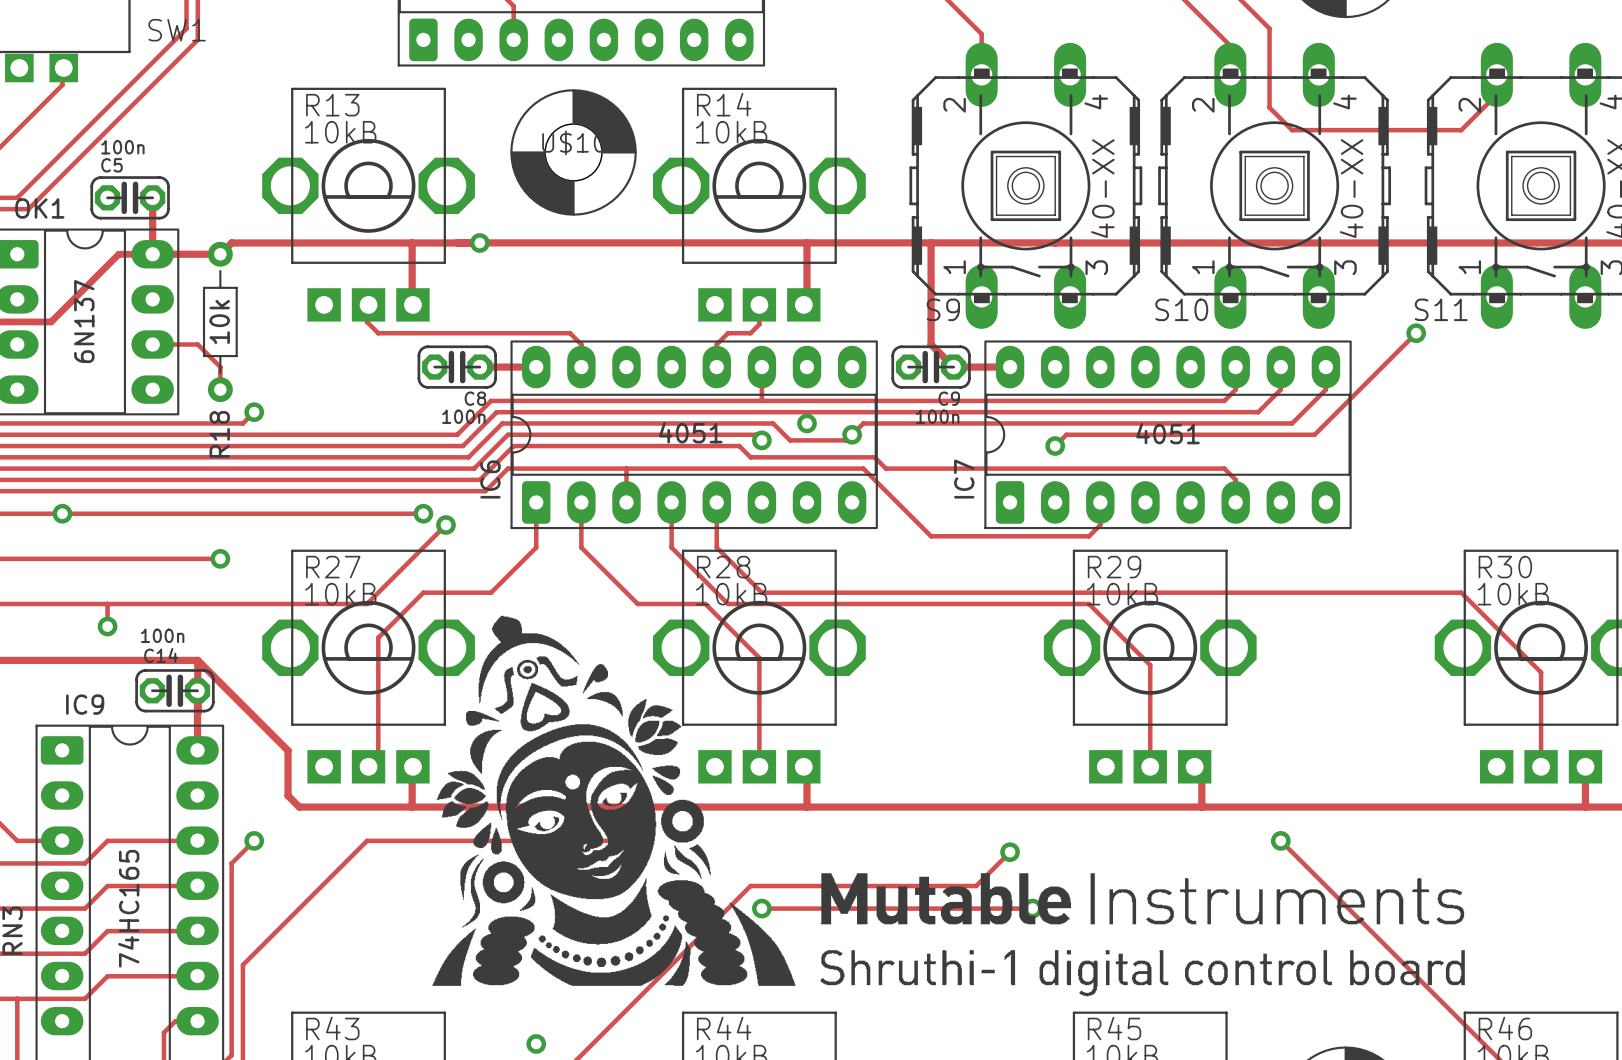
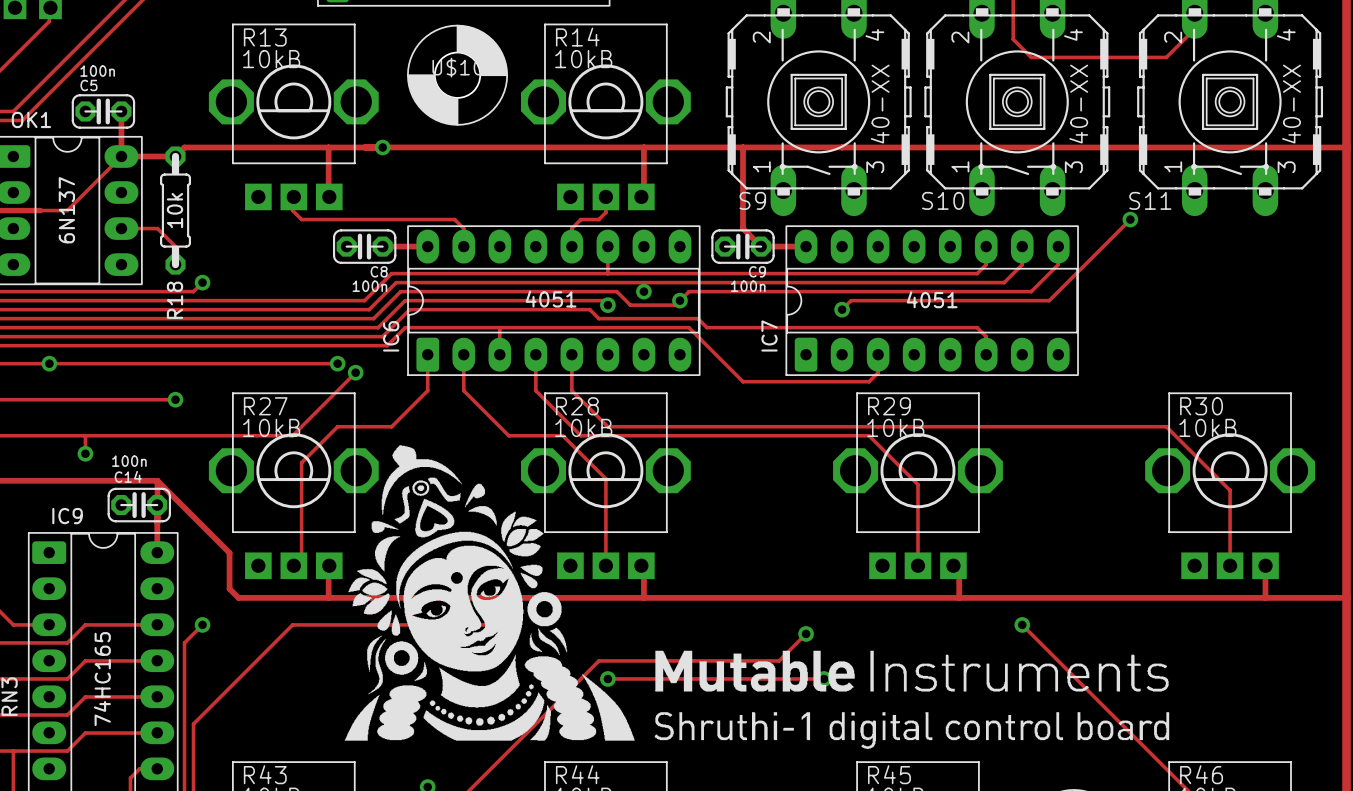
R18 footprint: [202, 241, 238, 403] -> [160, 146, 192, 275]
track: (152, 254) (118, 254) (51, 321) -> (121, 156) (67, 210) (40, 210)

